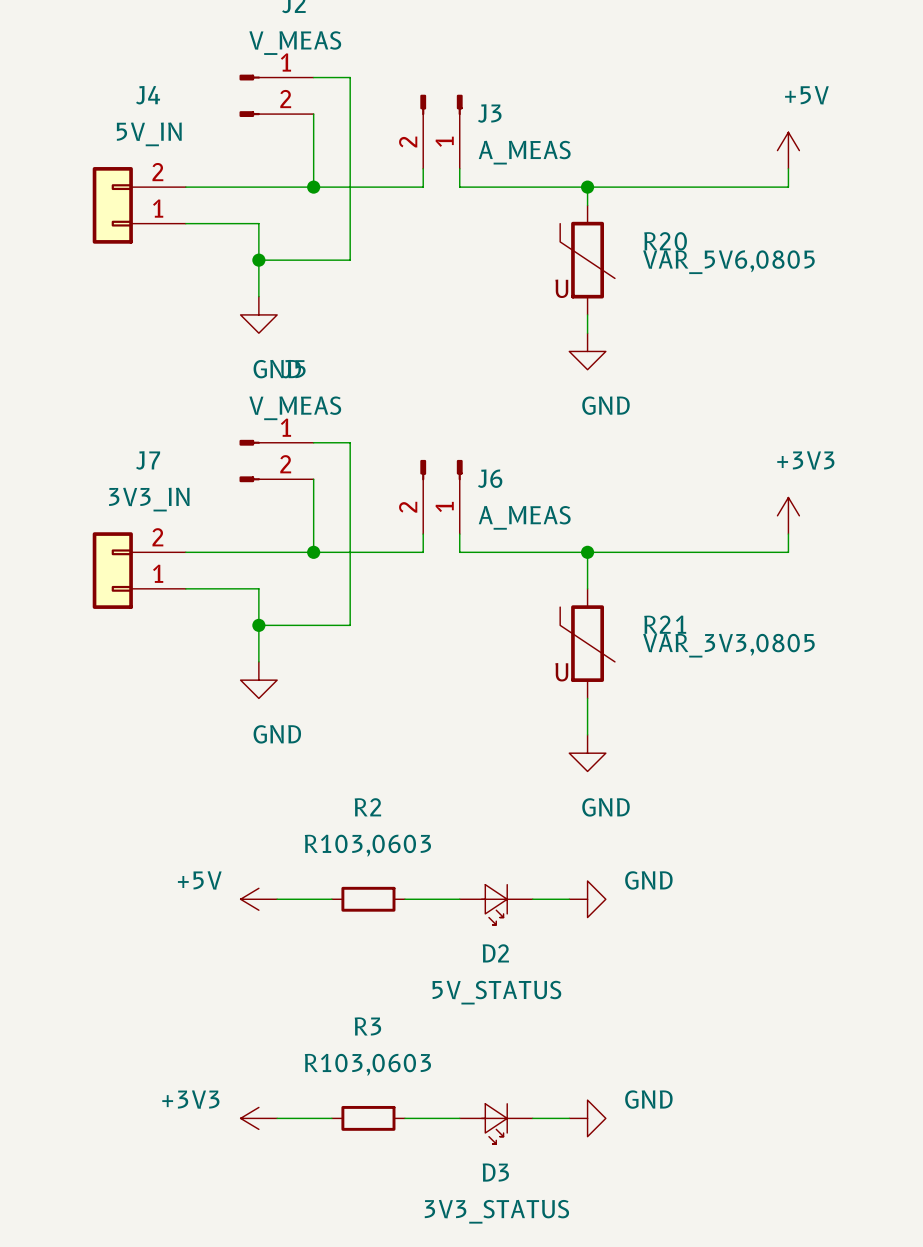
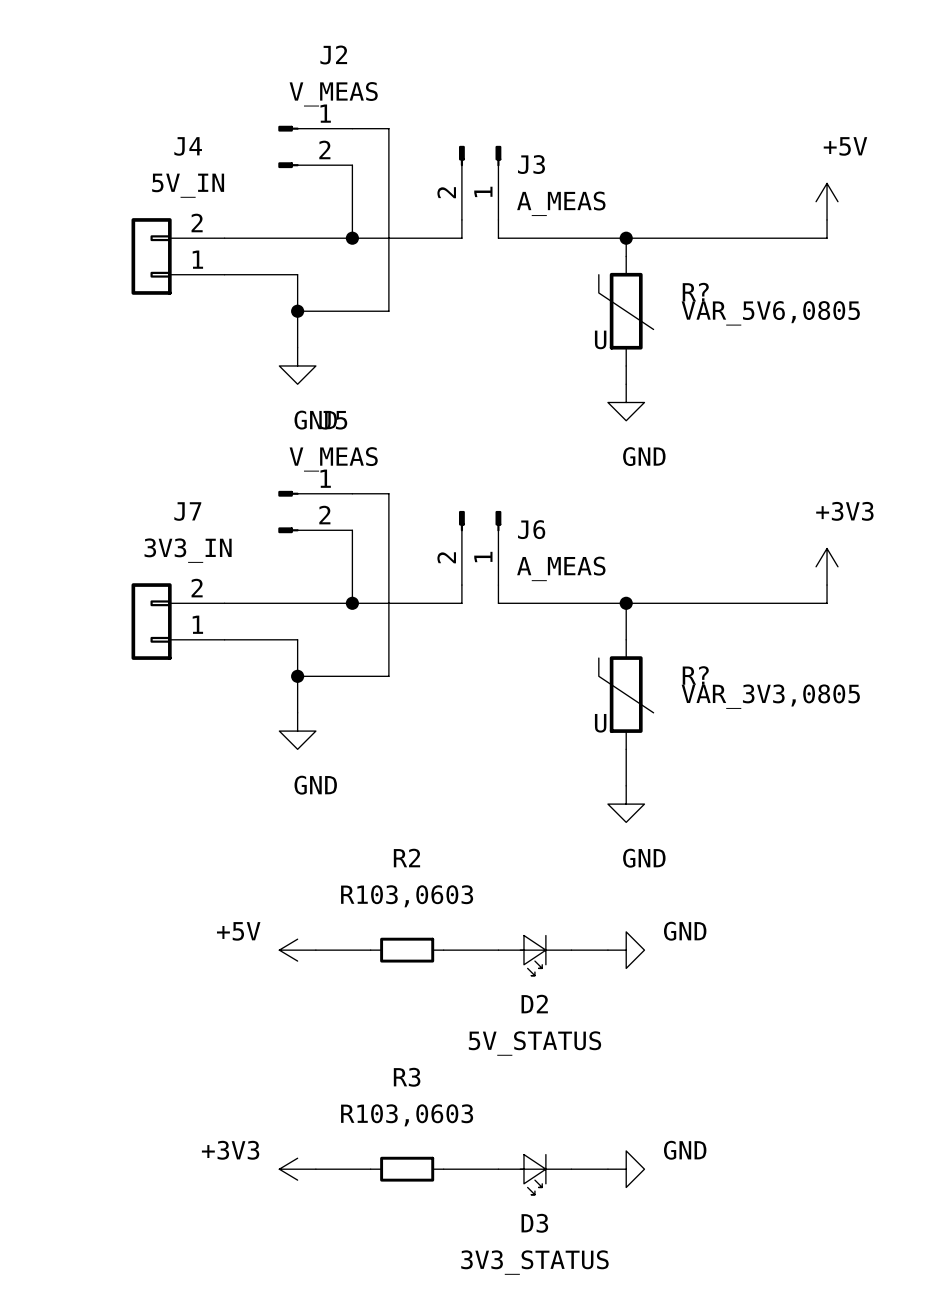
R20 name: R20 (665, 241) -> R? (695, 292)
R21 name: R21 (665, 624) -> R? (695, 675)

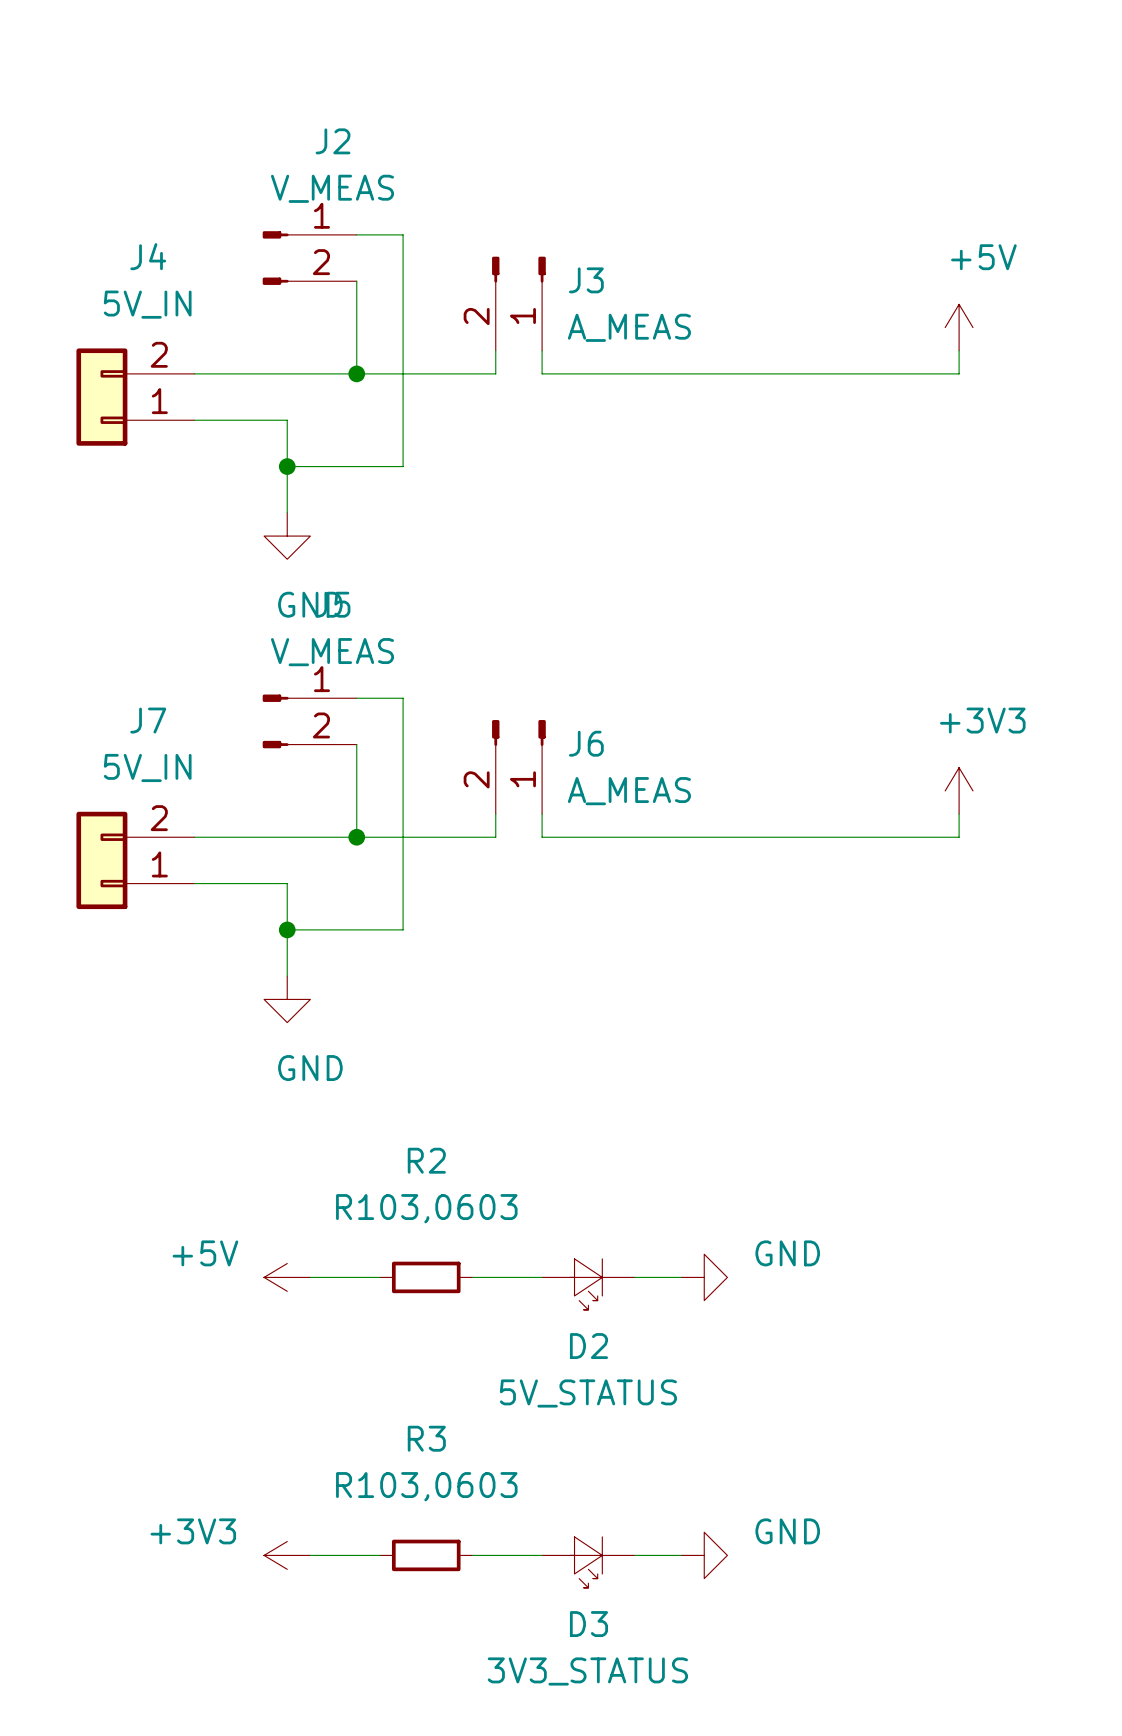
wire: (626, 238) (626, 256) -> none
junction: (626, 238) -> none
R?: VAR_5V6,0805 (626, 311) -> none
wire: (626, 365) (626, 384) -> none
power symbol: GND (626, 402) -> none
J7 value: 3V3_IN (188, 550) -> 5V_IN (147, 767)
wire: (626, 603) (626, 639) -> none
junction: (626, 603) -> none
R?: VAR_3V3,0805 (626, 694) -> none
wire: (626, 749) (626, 785) -> none
power symbol: GND (626, 804) -> none

